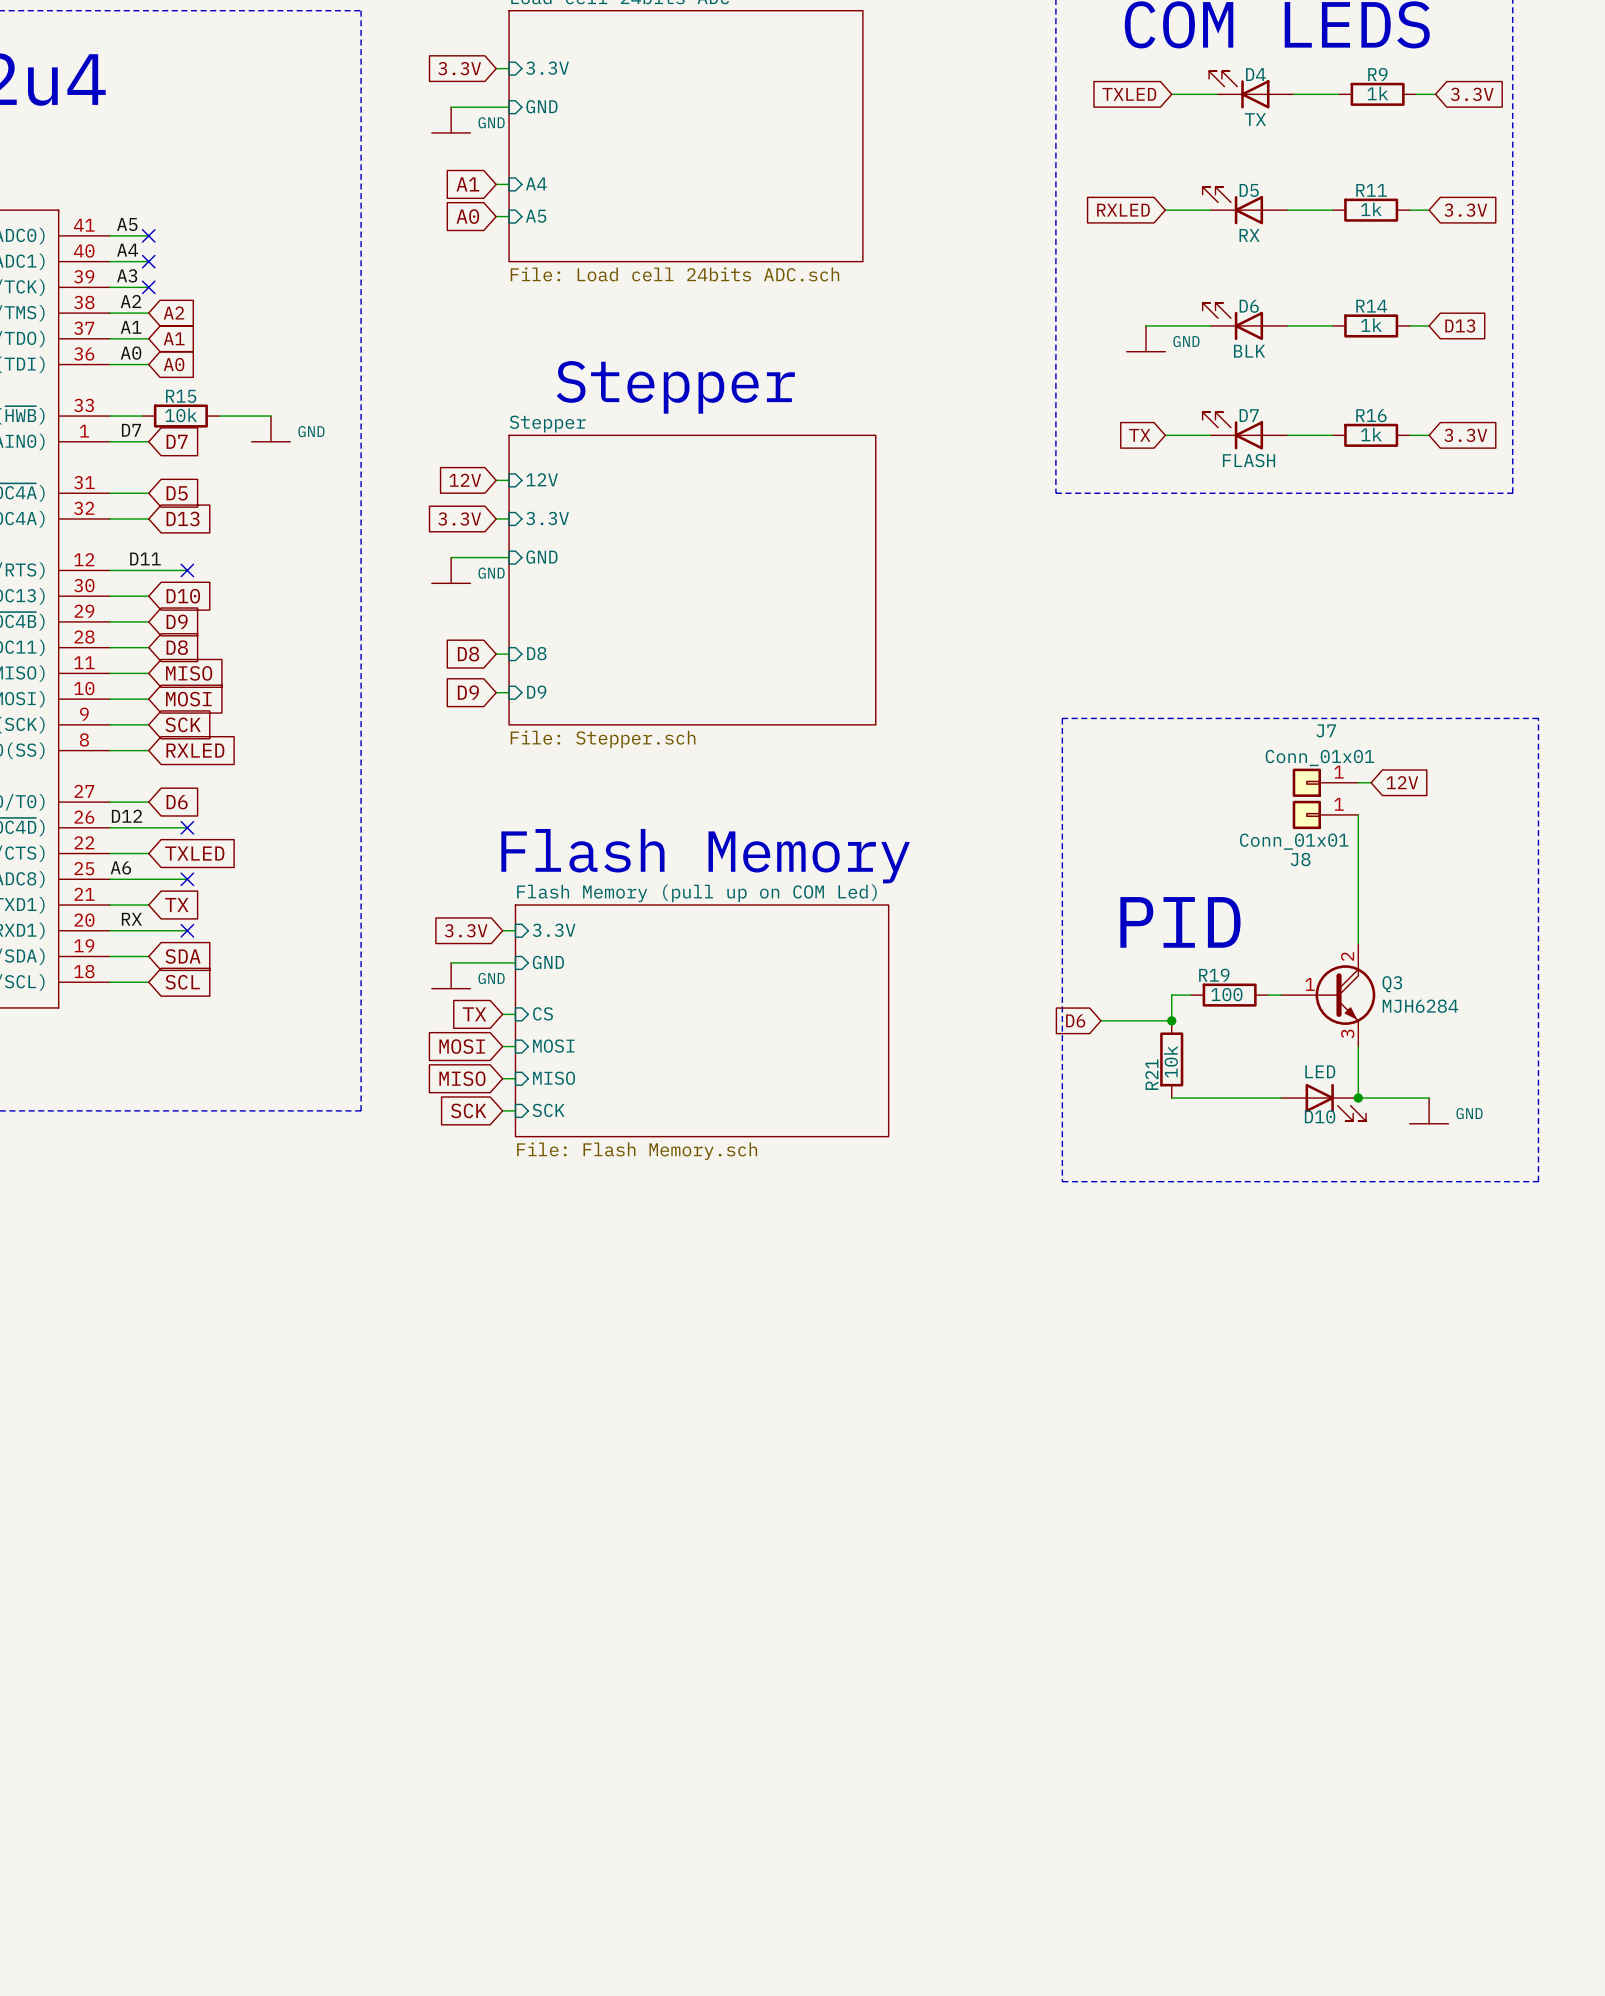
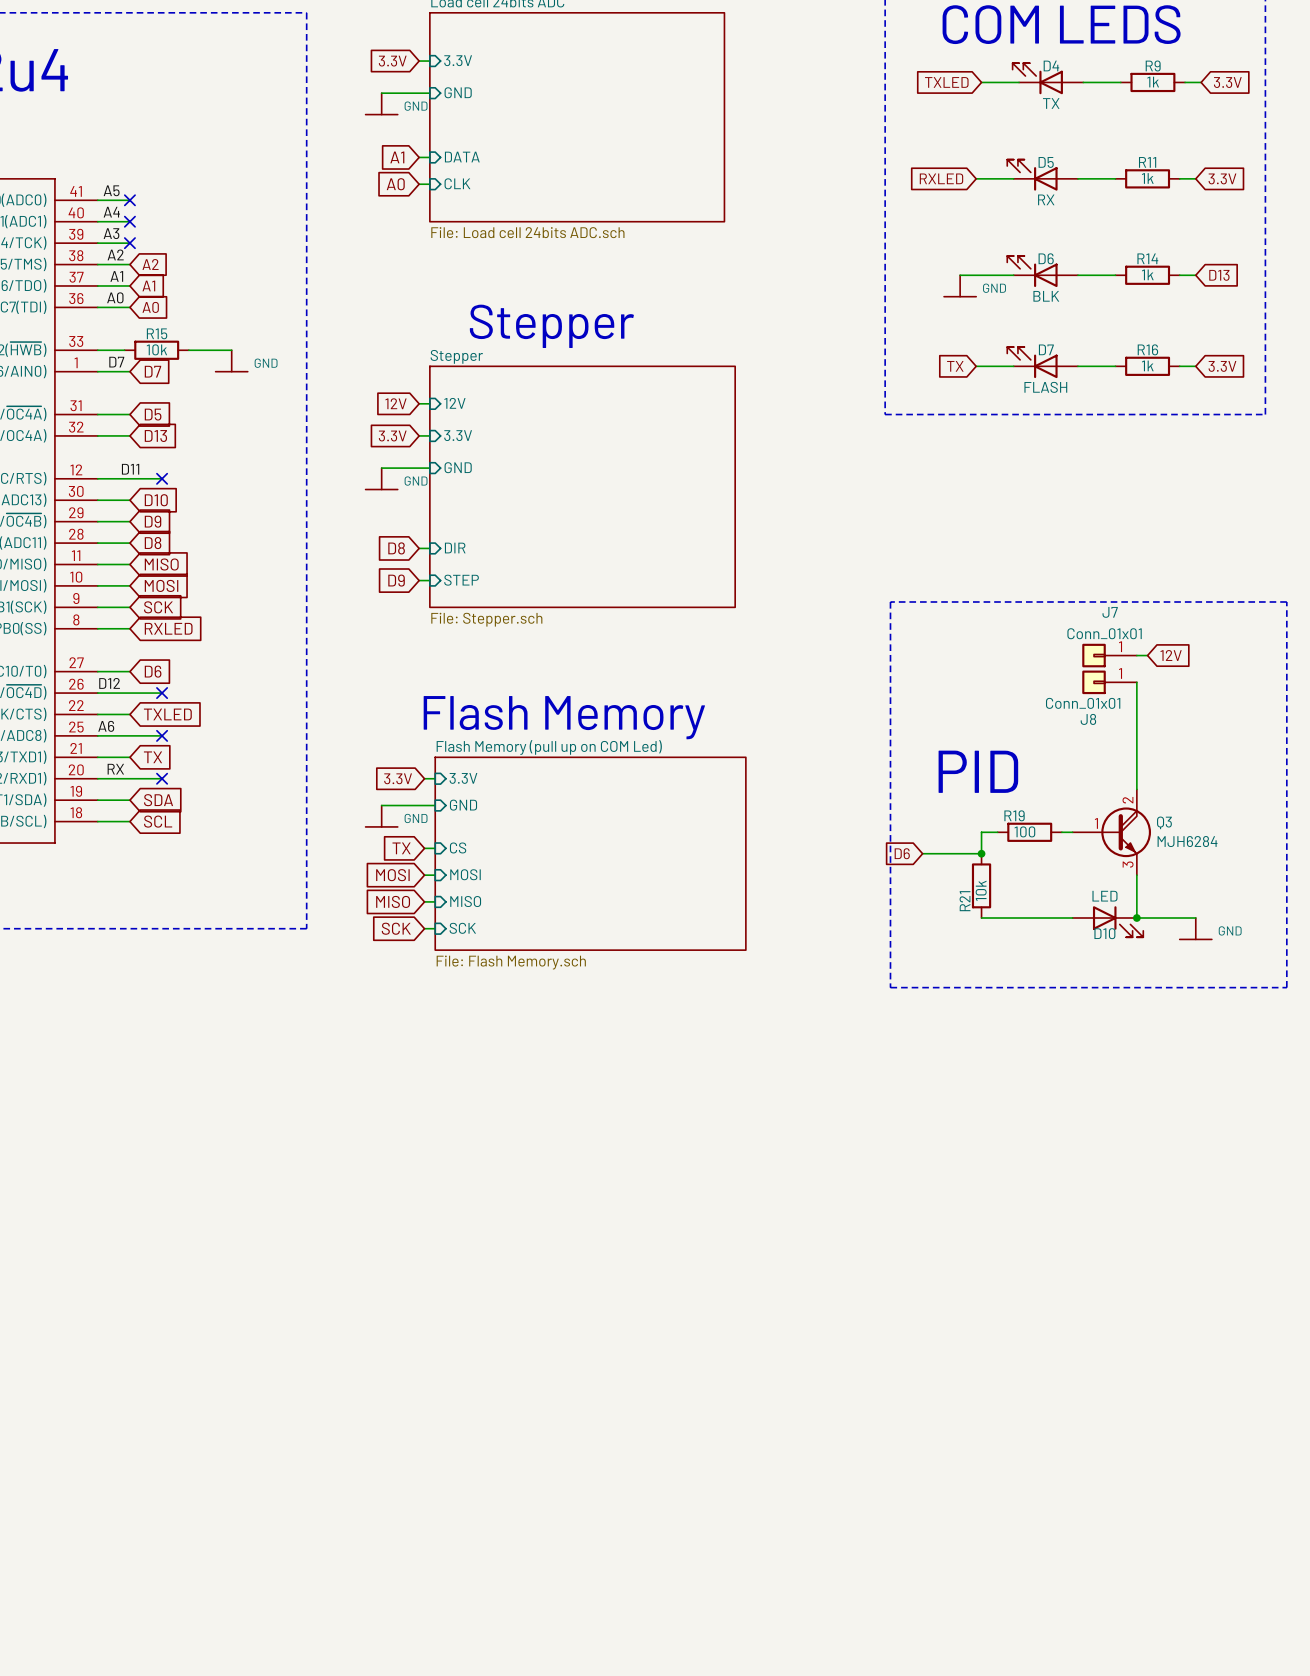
sheet pin: A4 (536, 183) -> DATA (462, 157)
sheet pin: A5 (536, 216) -> CLK (457, 183)
sheet pin: D8 (536, 653) -> DIR (455, 548)
sheet pin: D9 (536, 692) -> STEP (461, 580)

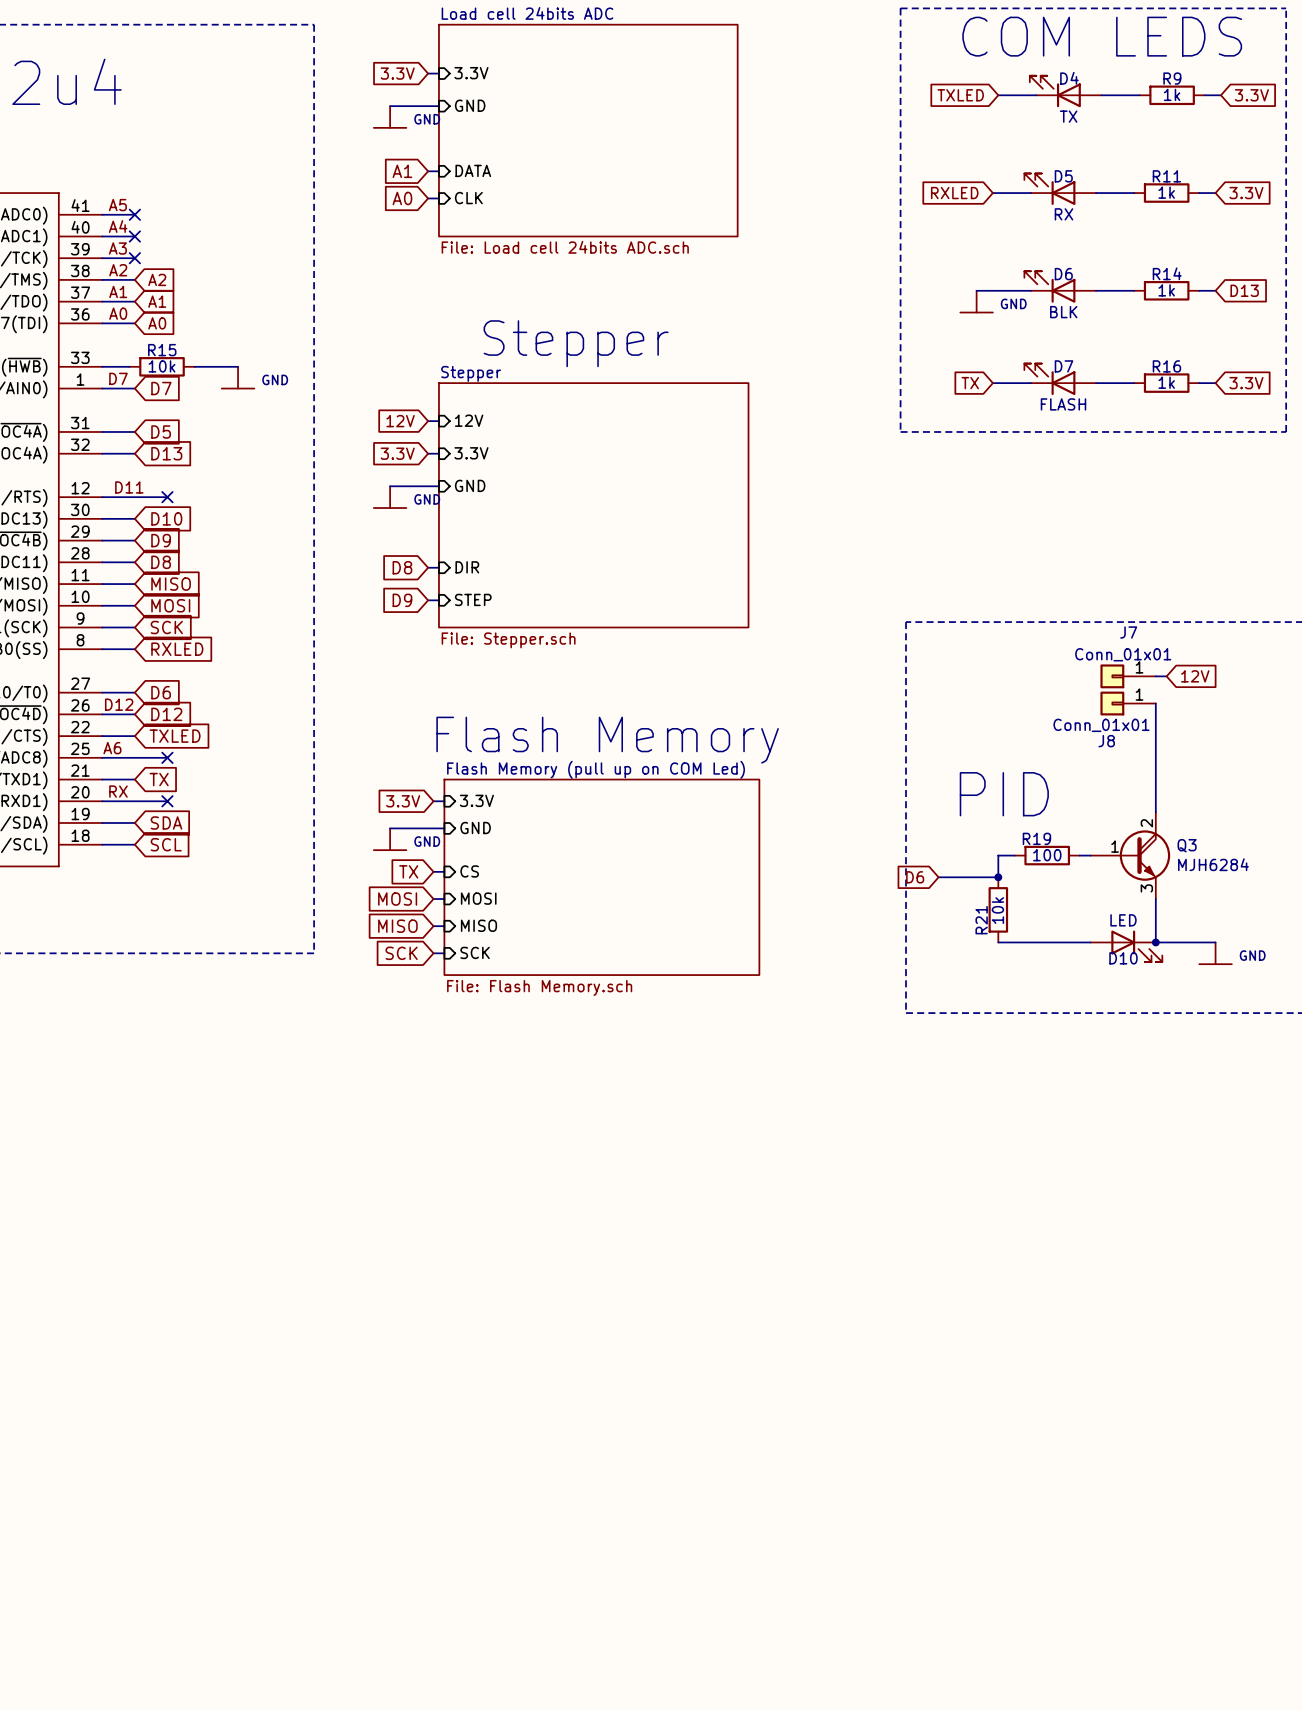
global label: none -> D12 (166, 714)
wire: (129, 693) (162, 693) -> none
no-connect mark: (162, 693) -> none

